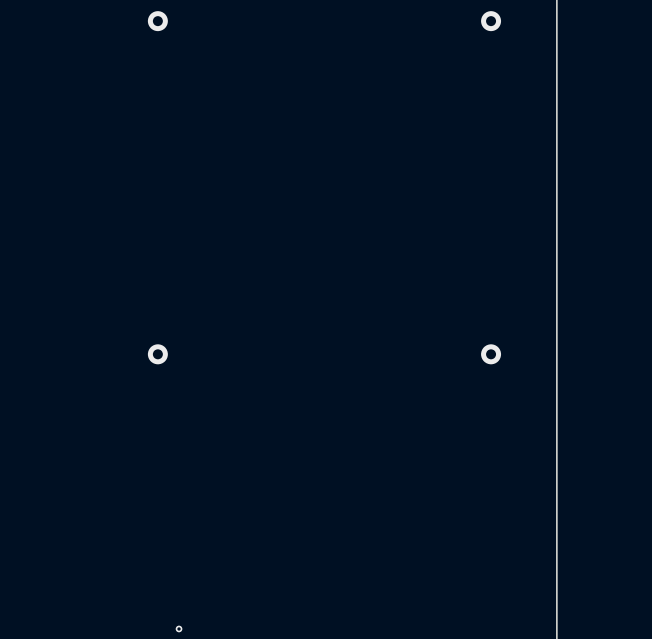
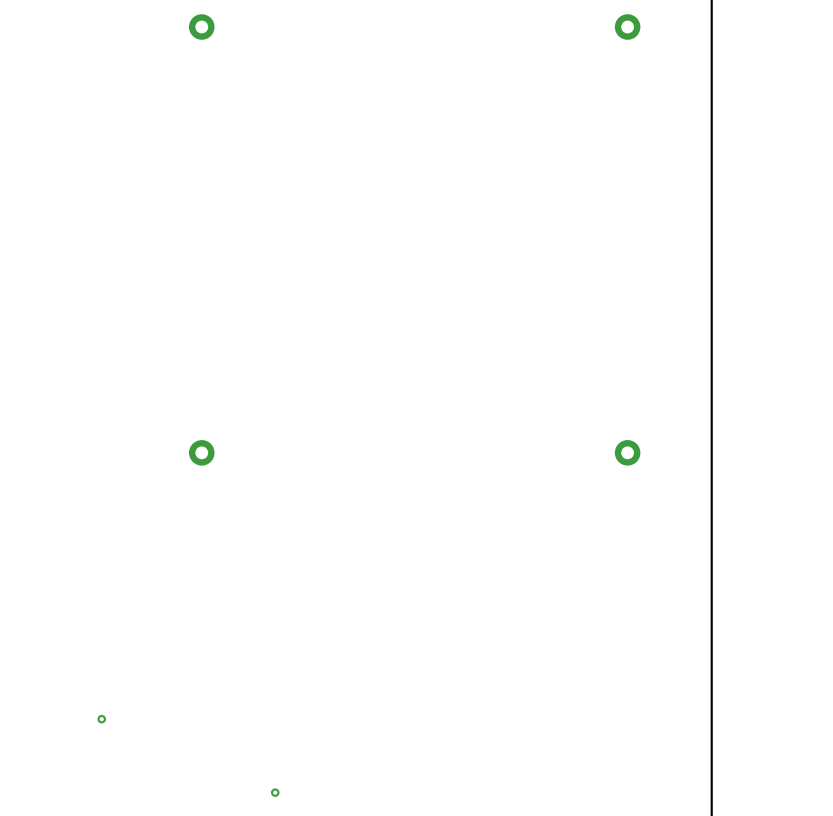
via: none -> (101, 719)
via: none -> (275, 792)
via: (179, 628) -> none

